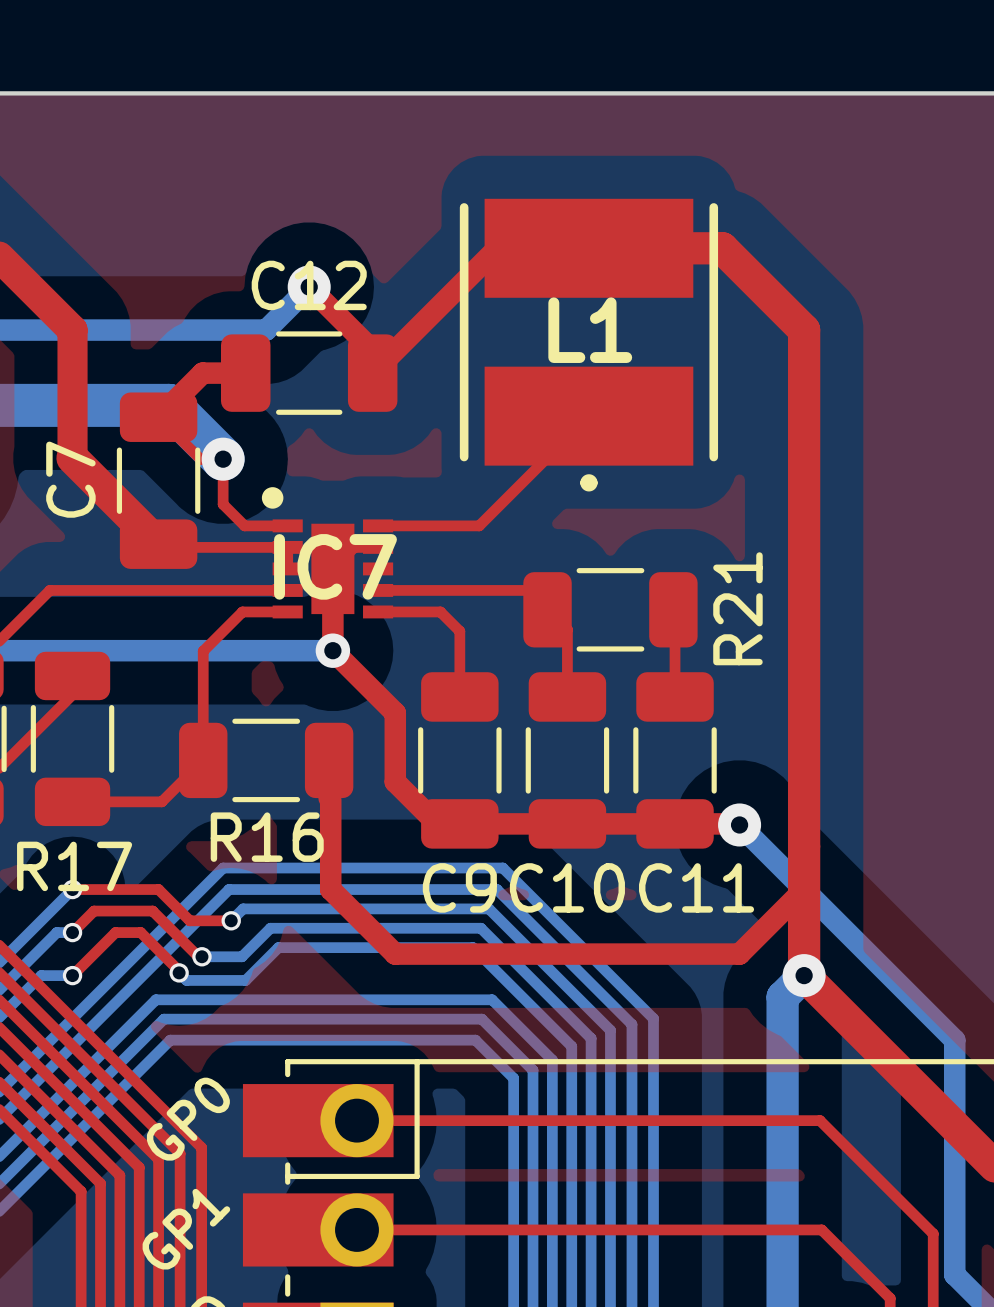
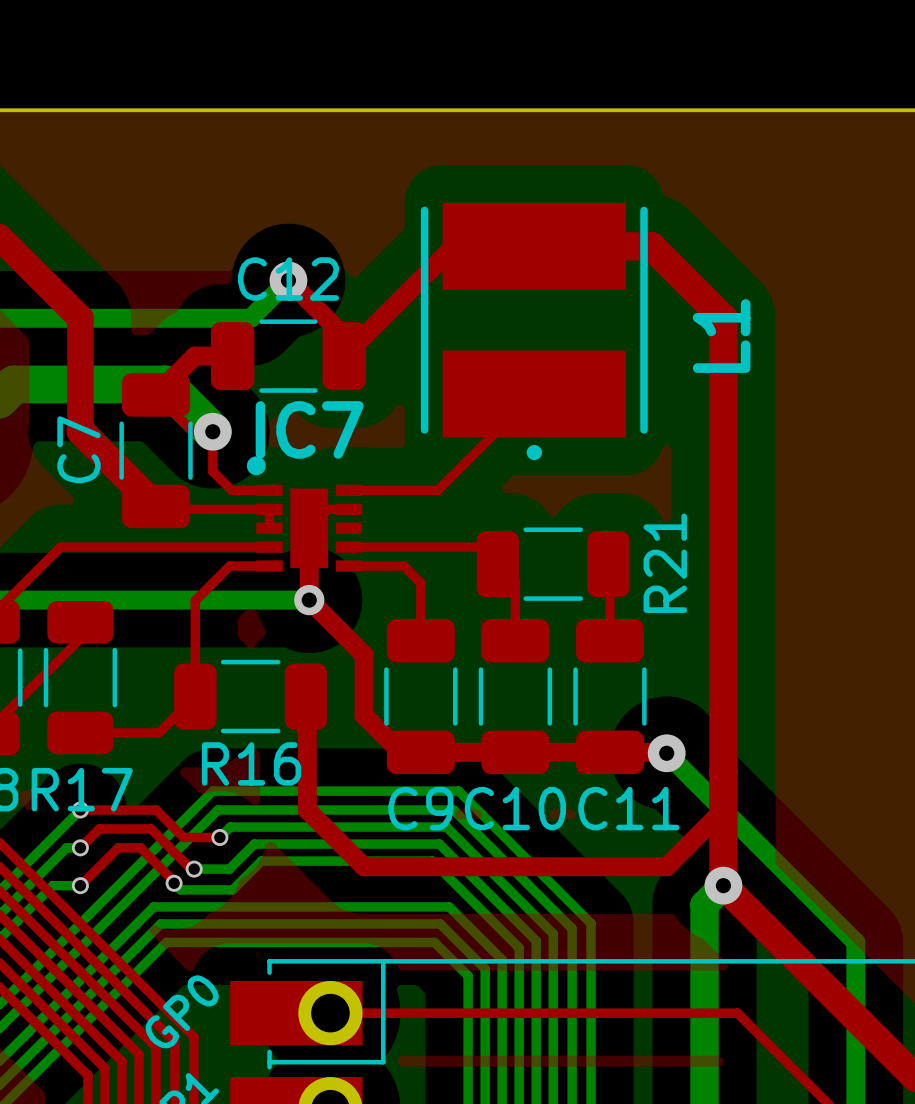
L1 name rotation: 0° (590, 330) -> 90° counterclockwise (721, 336)
L1 name position: L1 (590, 330) -> L1 (721, 336)
IC7 name position: IC7 (335, 566) -> IC7 (309, 429)

